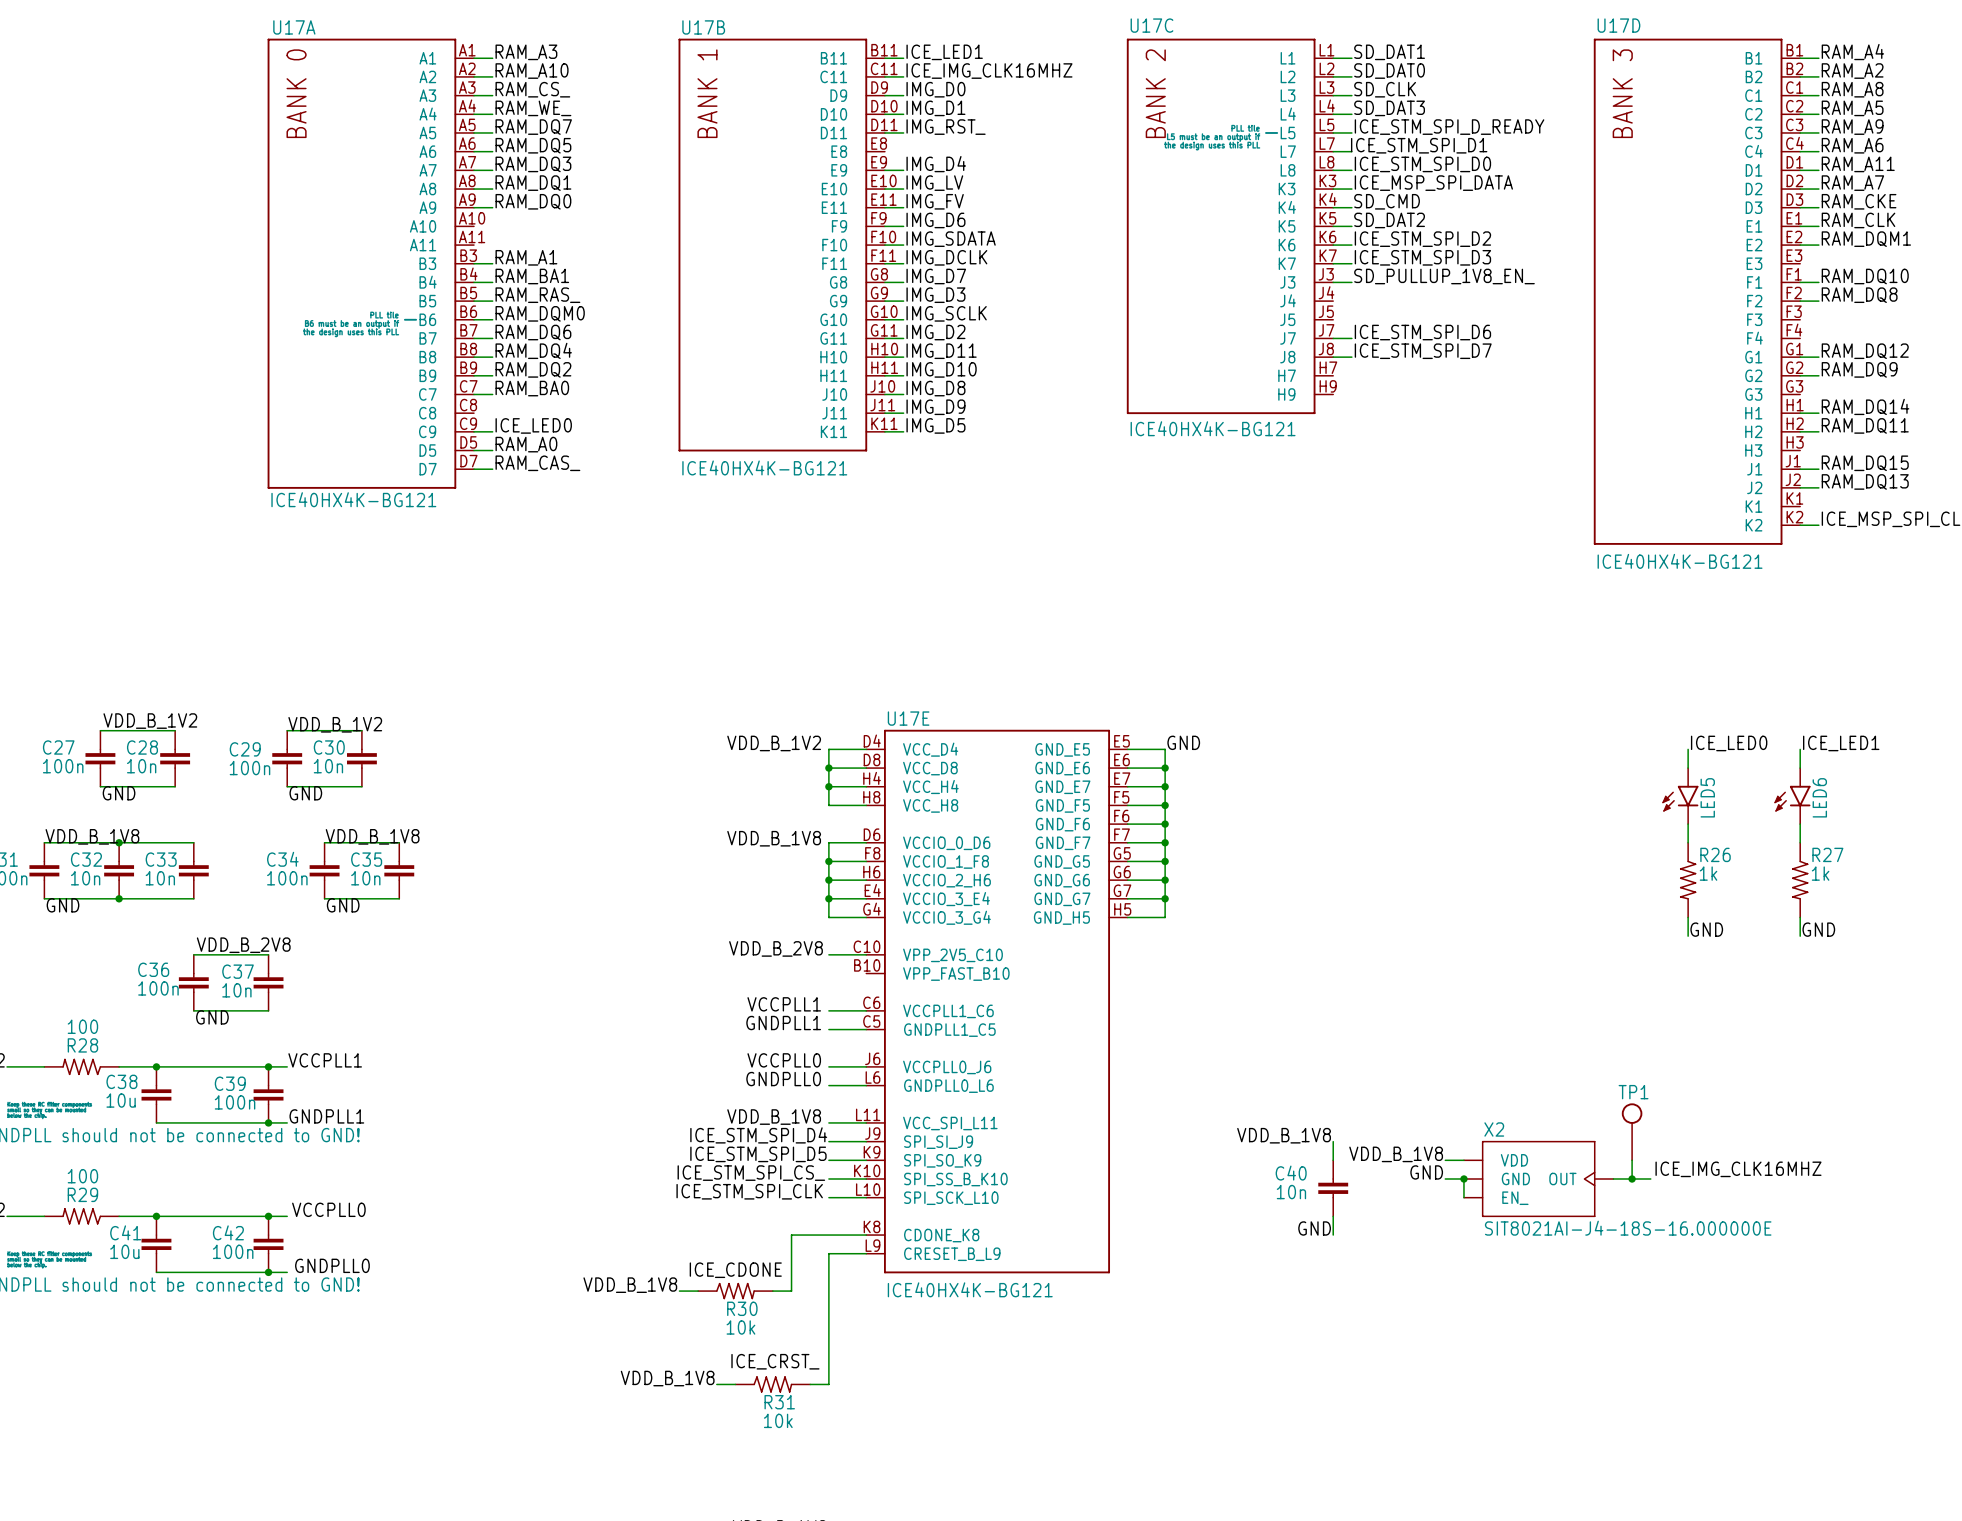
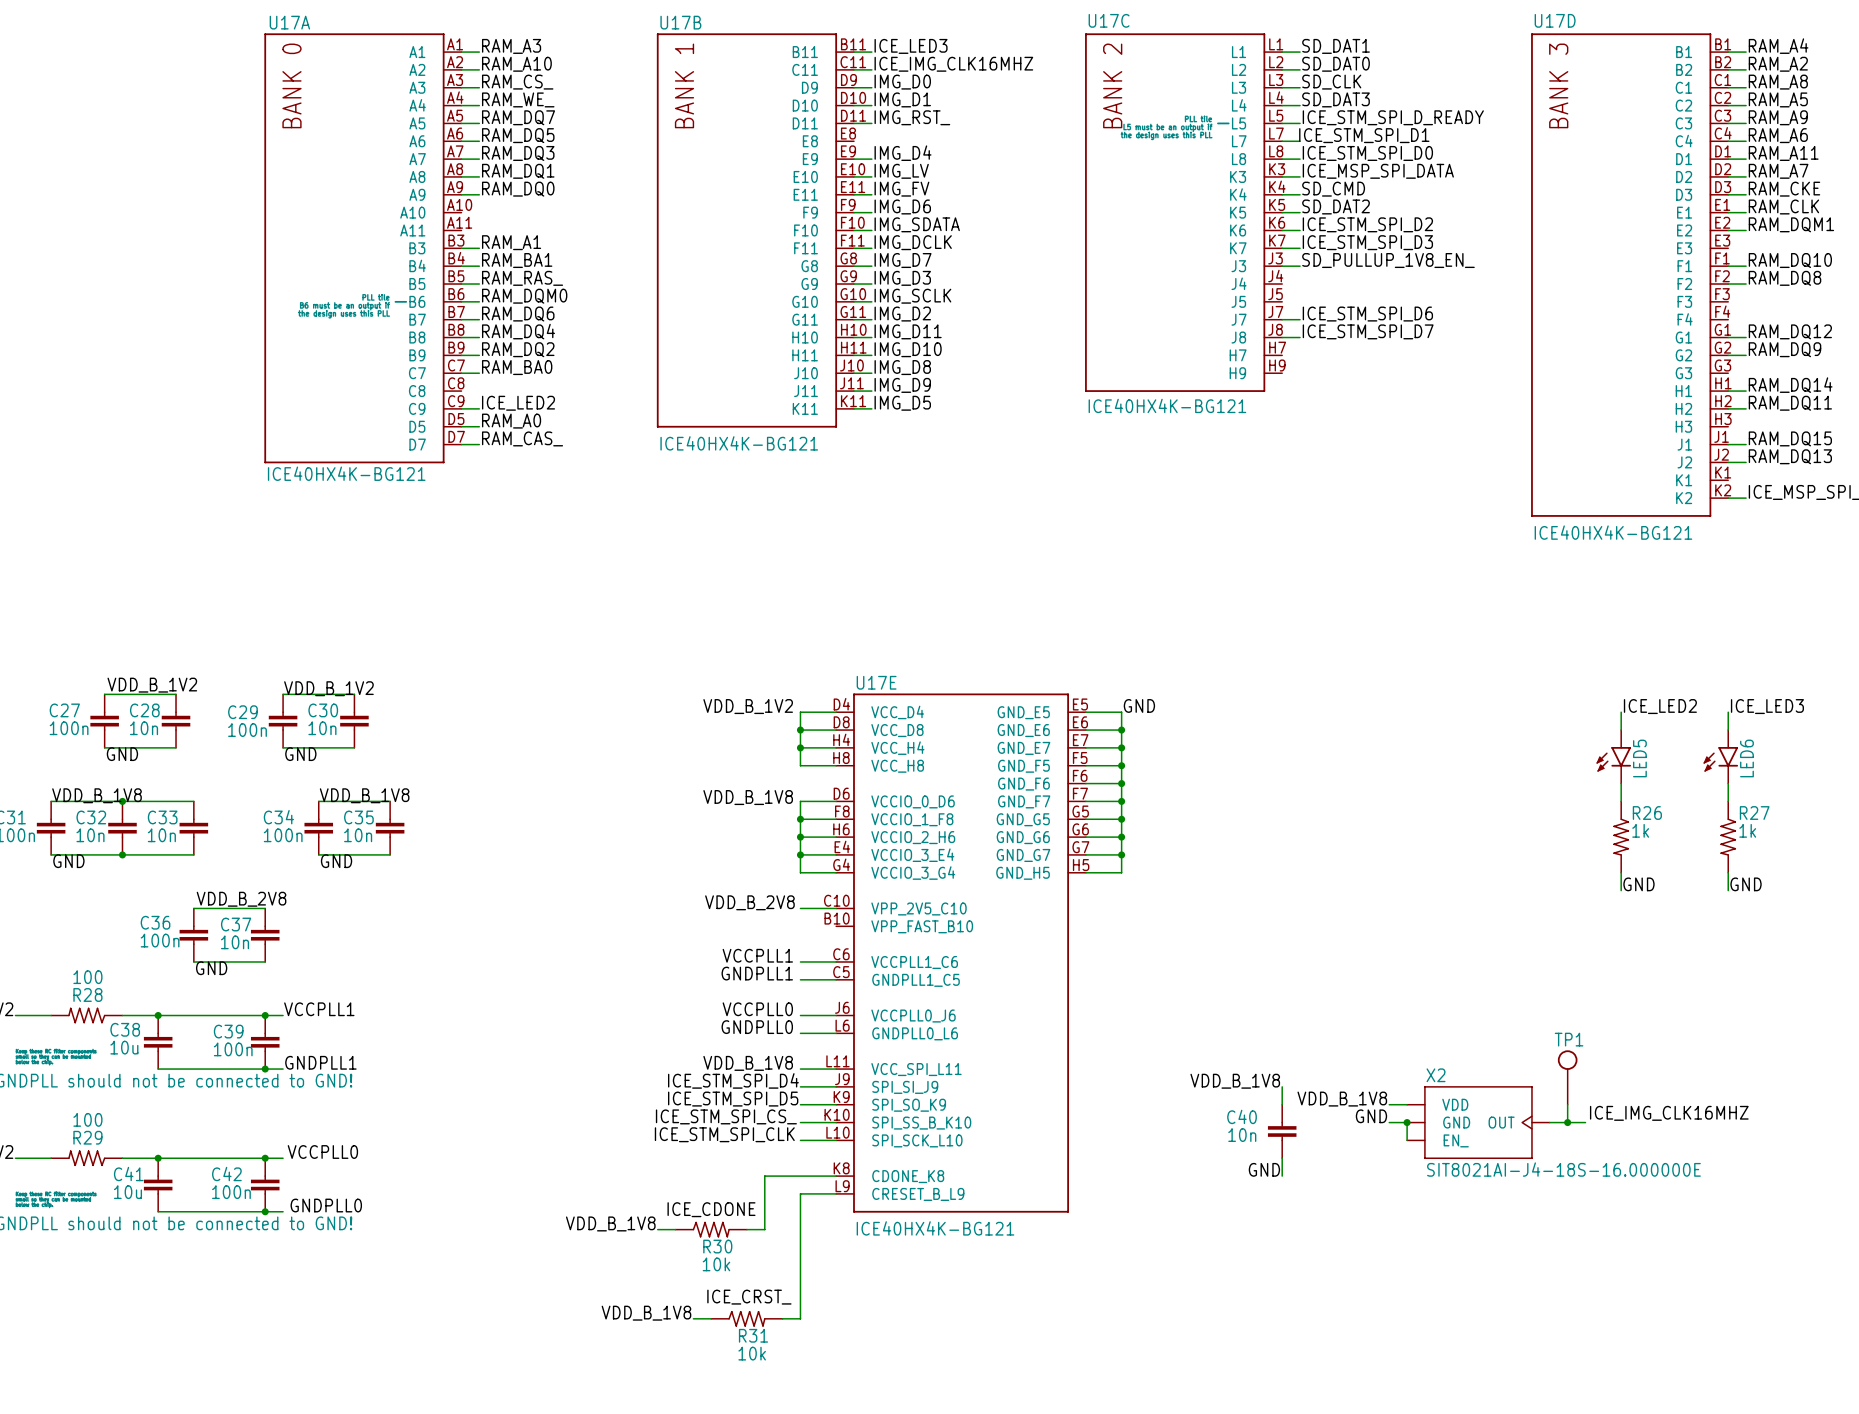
label: ICE_LED1 (944, 52) -> ICE_LED3 (911, 46)
label: ICE_LED0 (533, 425) -> ICE_LED2 (518, 403)
label: ICE_LED0 (1729, 743) -> ICE_LED2 (1660, 706)
label: ICE_LED1 (1841, 743) -> ICE_LED3 (1767, 706)

